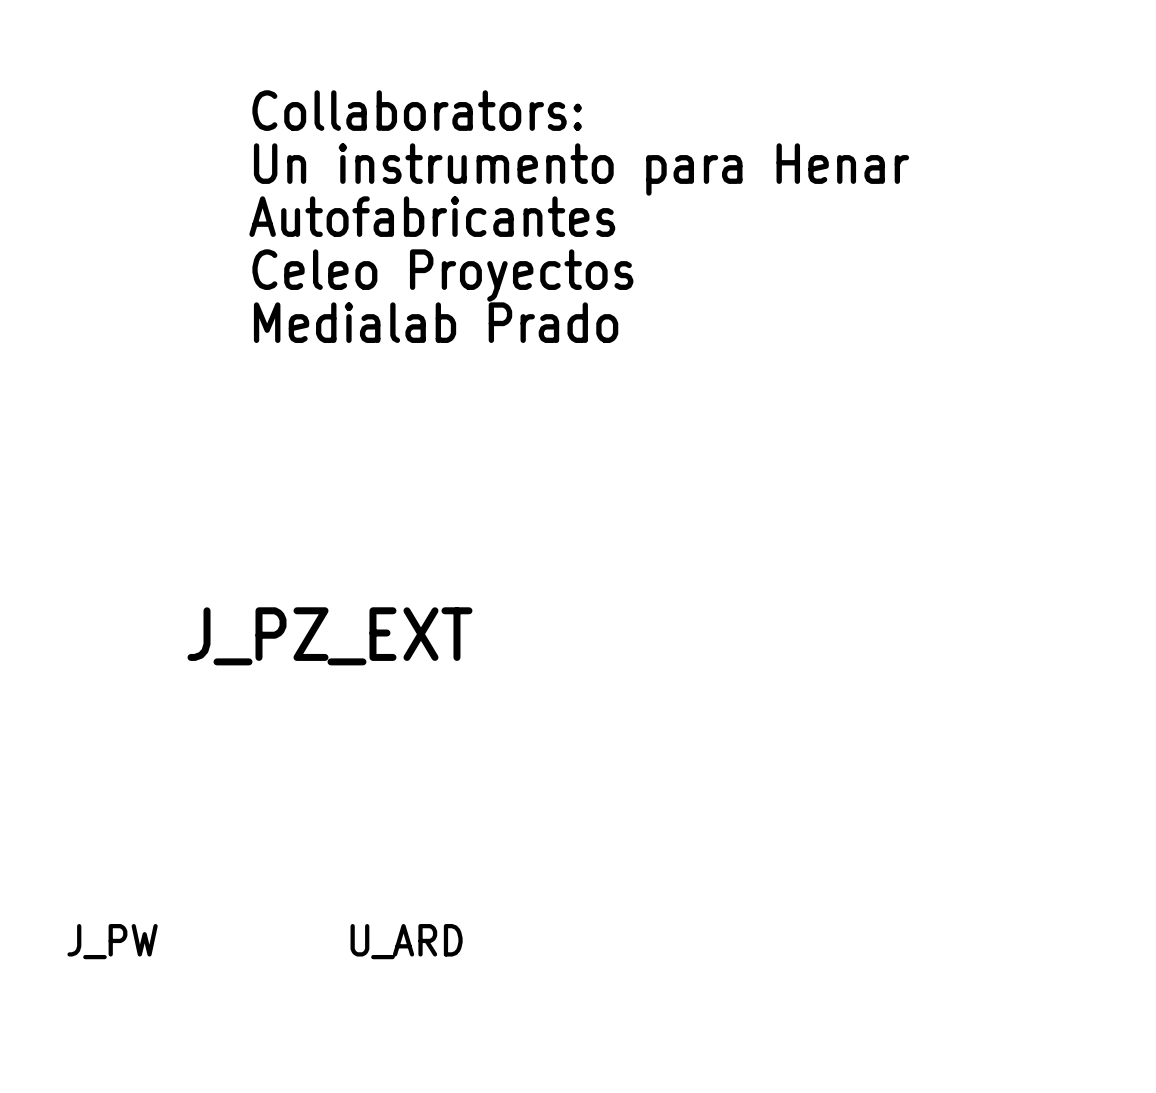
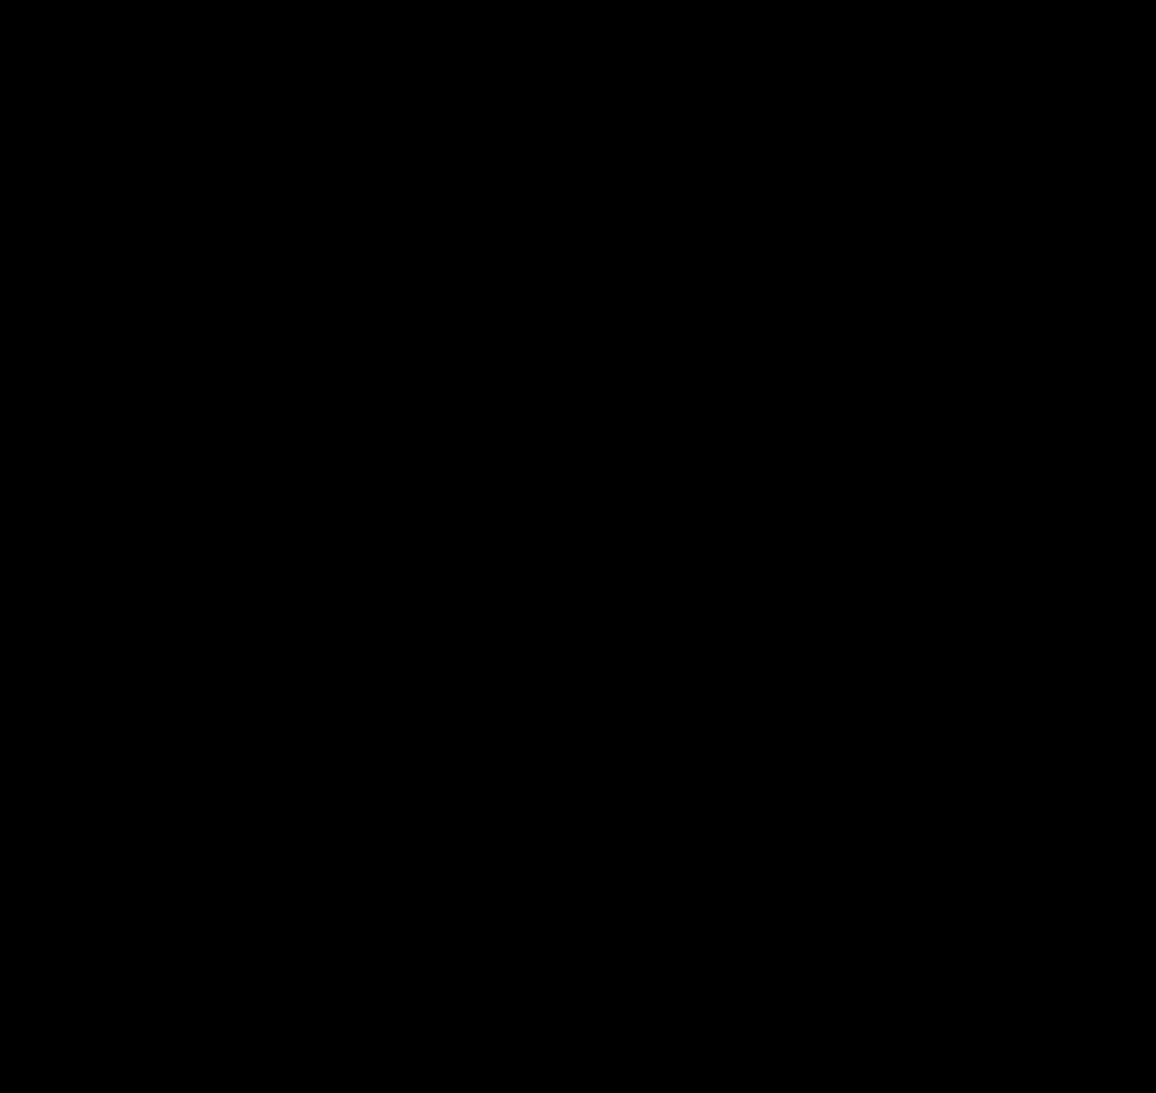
text: Collaborators: (417, 110) -> none
text: Un instrumento para Henar (581, 169) -> none
text: Autofabricantes (432, 216) -> none
text: Celeo Proyectos (442, 275) -> none
text: Medialab Prado (436, 322) -> none
text: J_PZ_EXT (329, 636) -> none
text: J_PW (112, 941) -> none
text: U_ARD (406, 941) -> none

